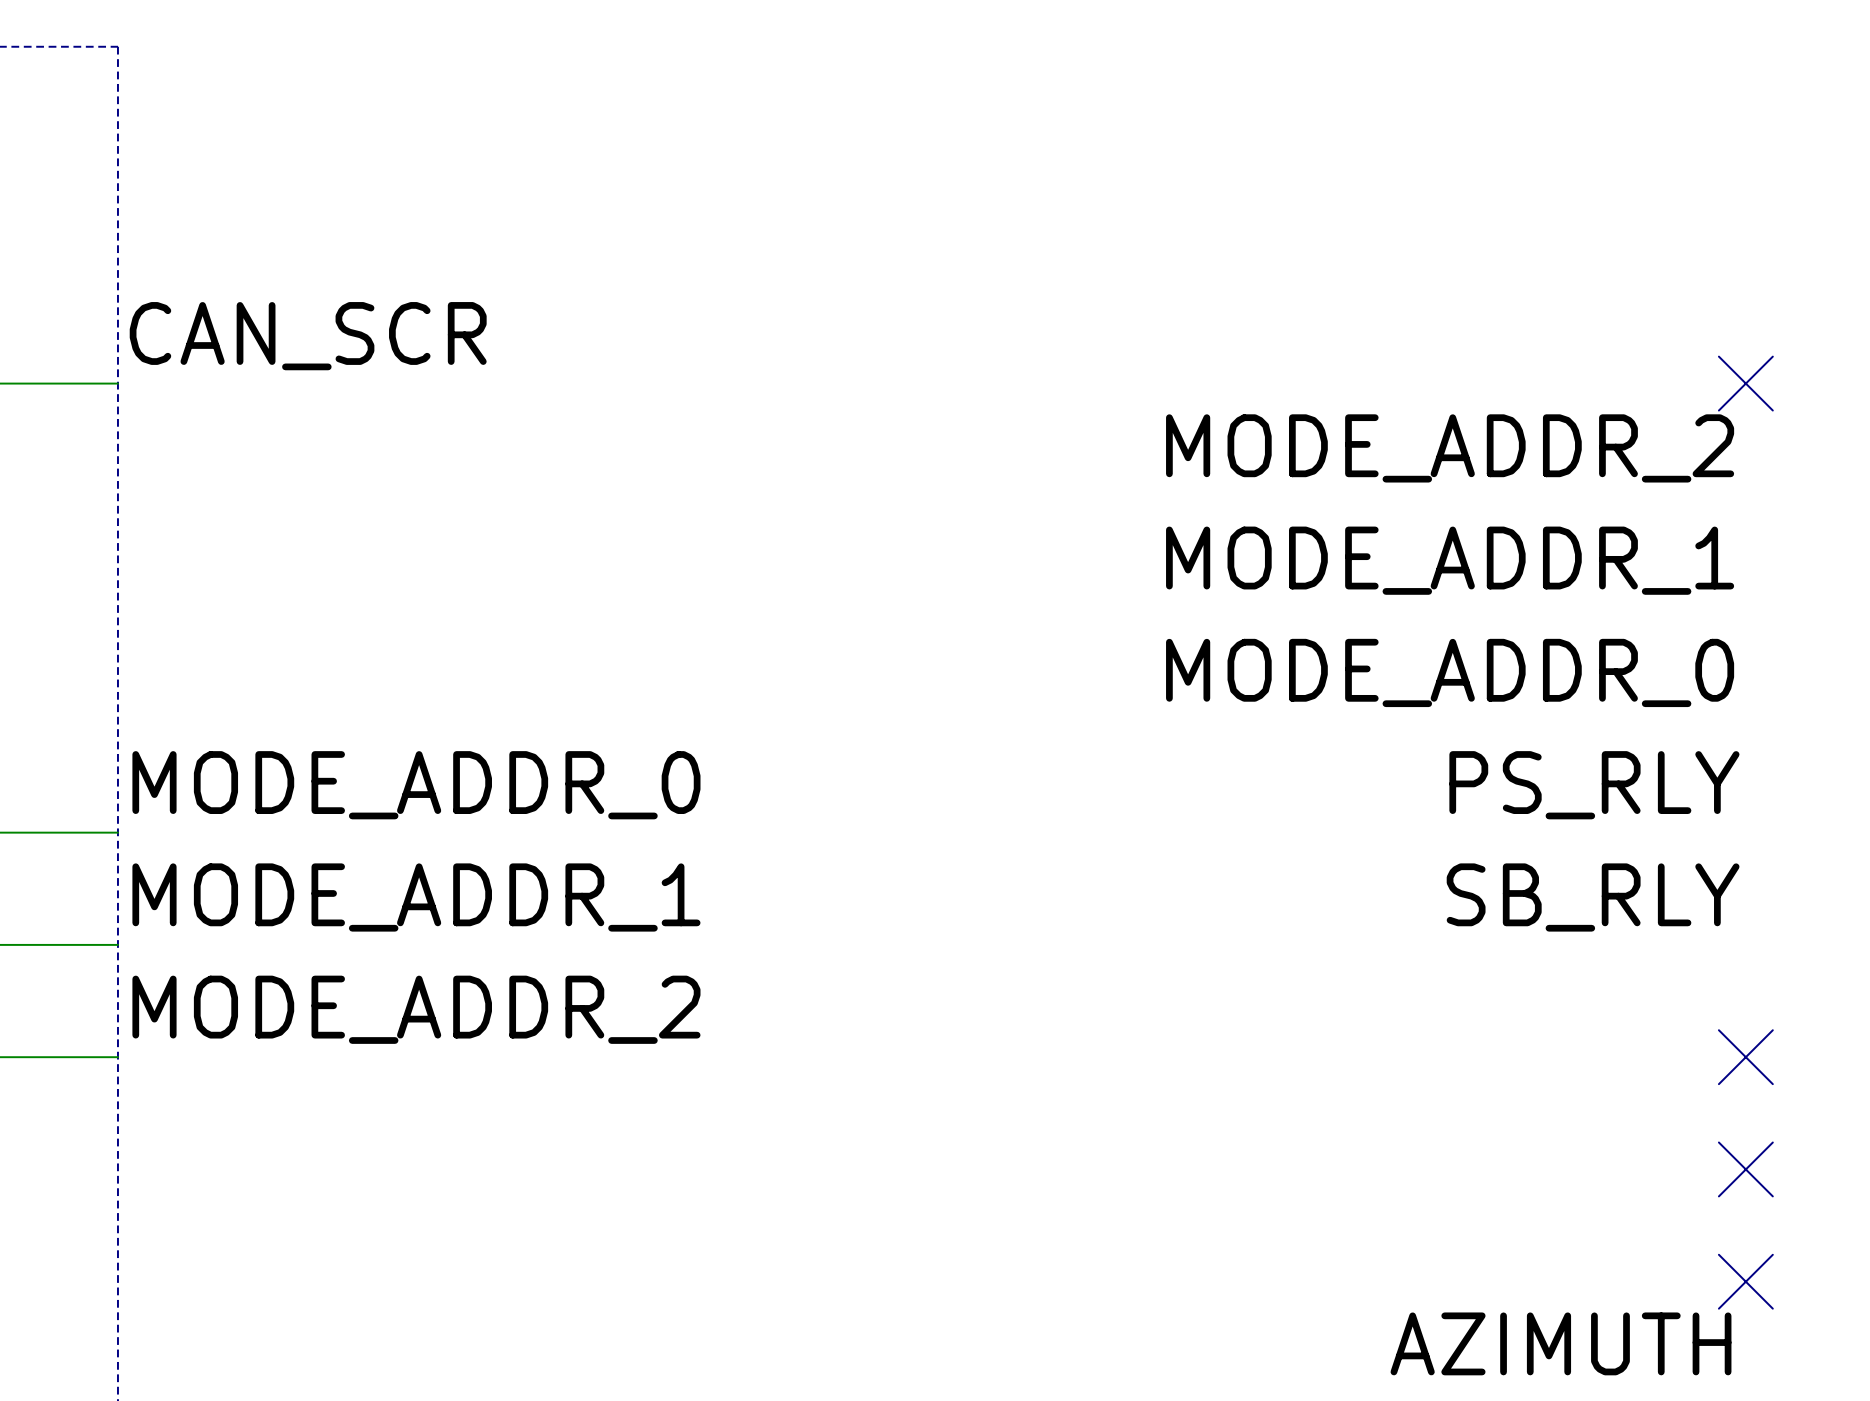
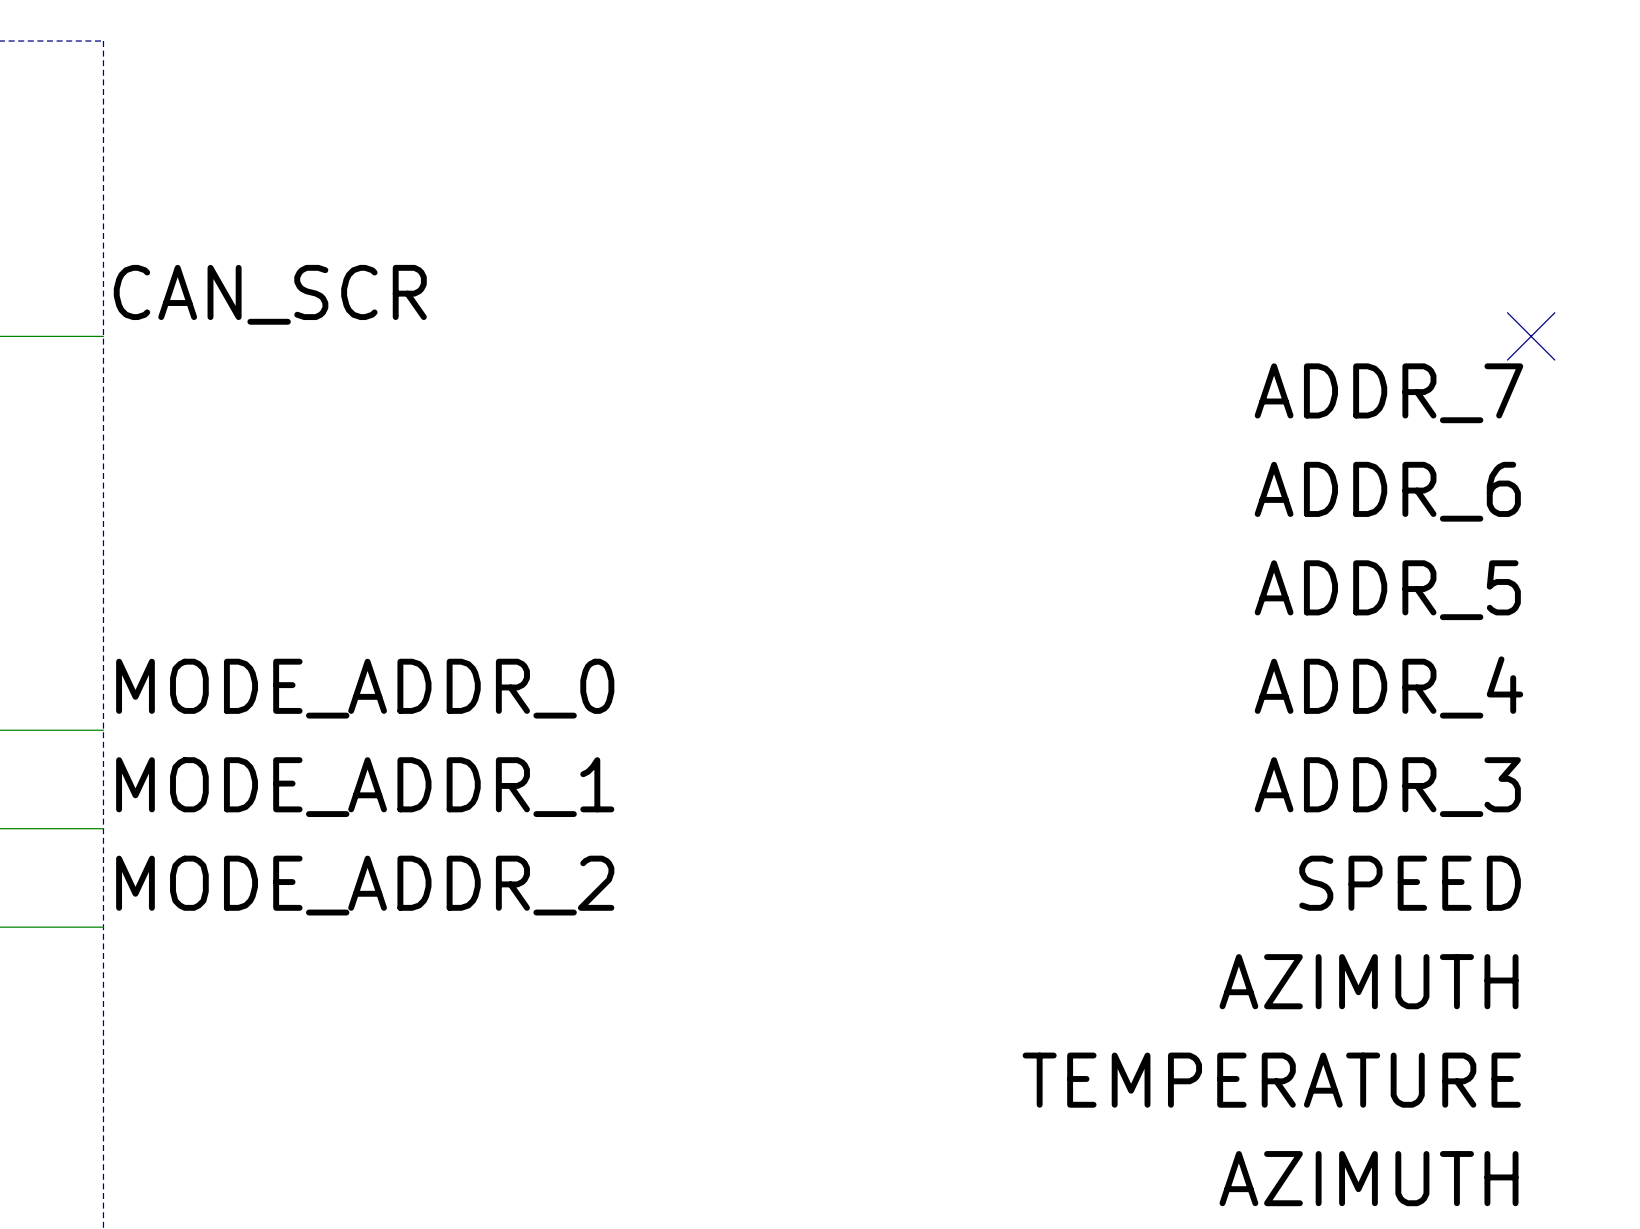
label: MODE_ADDR_2 (1450, 448) -> ADDR_7 (1388, 393)
label: MODE_ADDR_1 (1450, 560) -> ADDR_6 (1387, 491)
label: MODE_ADDR_0 (1450, 672) -> ADDR_5 (1387, 590)
label: PS_RLY (1594, 785) -> ADDR_4 (1388, 687)
label: SB_RLY (1593, 897) -> ADDR_3 (1387, 787)
label: none -> SPEED (1410, 883)
no-connect mark: (1745, 1057) -> none
label: none -> AZIMUTH (1369, 981)
no-connect mark: (1745, 1169) -> none
label: none -> TEMPERATURE (1271, 1080)
no-connect mark: (1745, 1281) -> none

